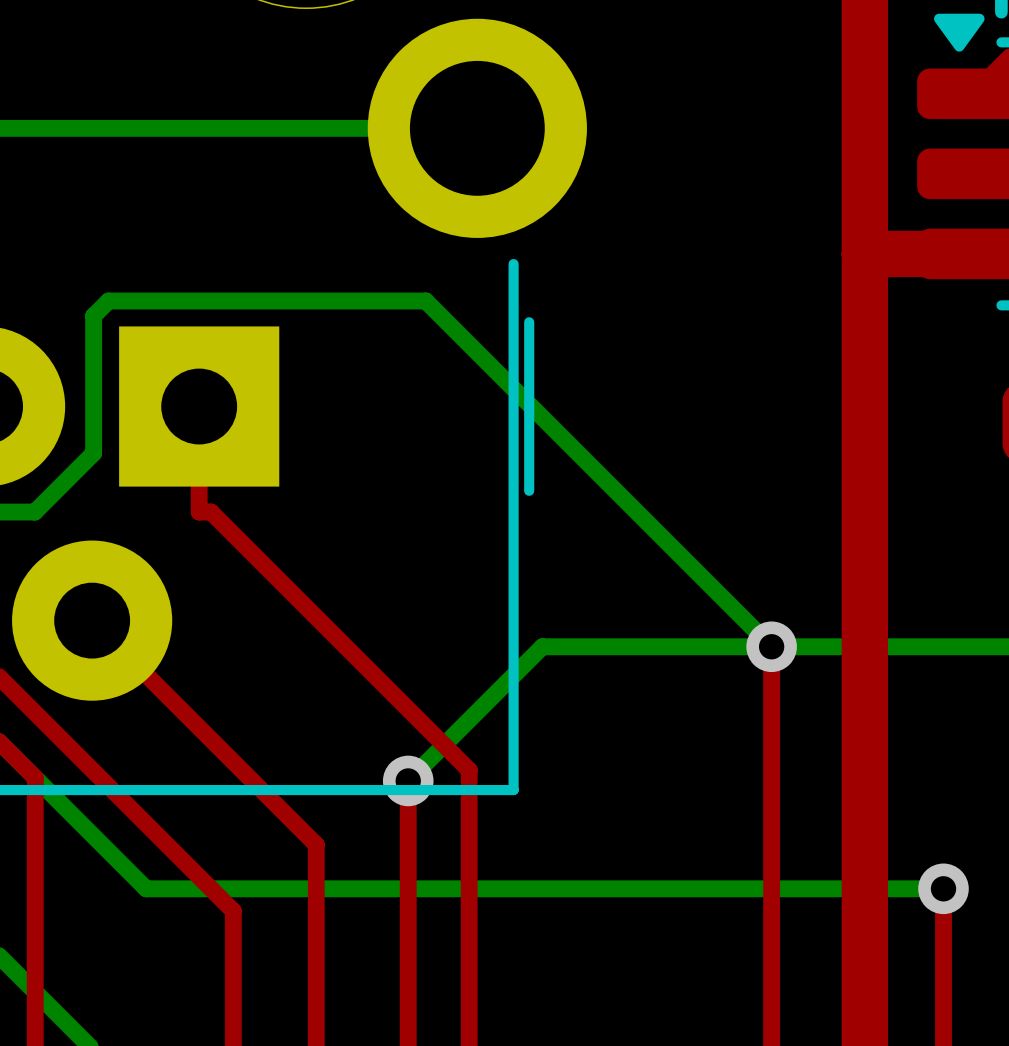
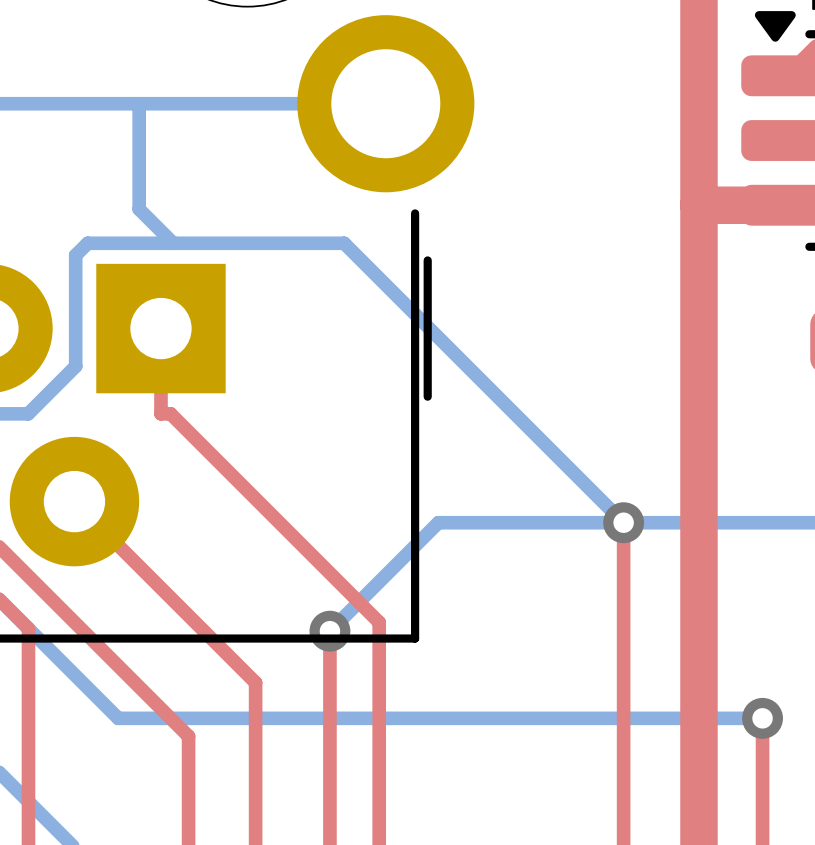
bottom track: none -> (139, 103) (139, 209) (173, 243)

